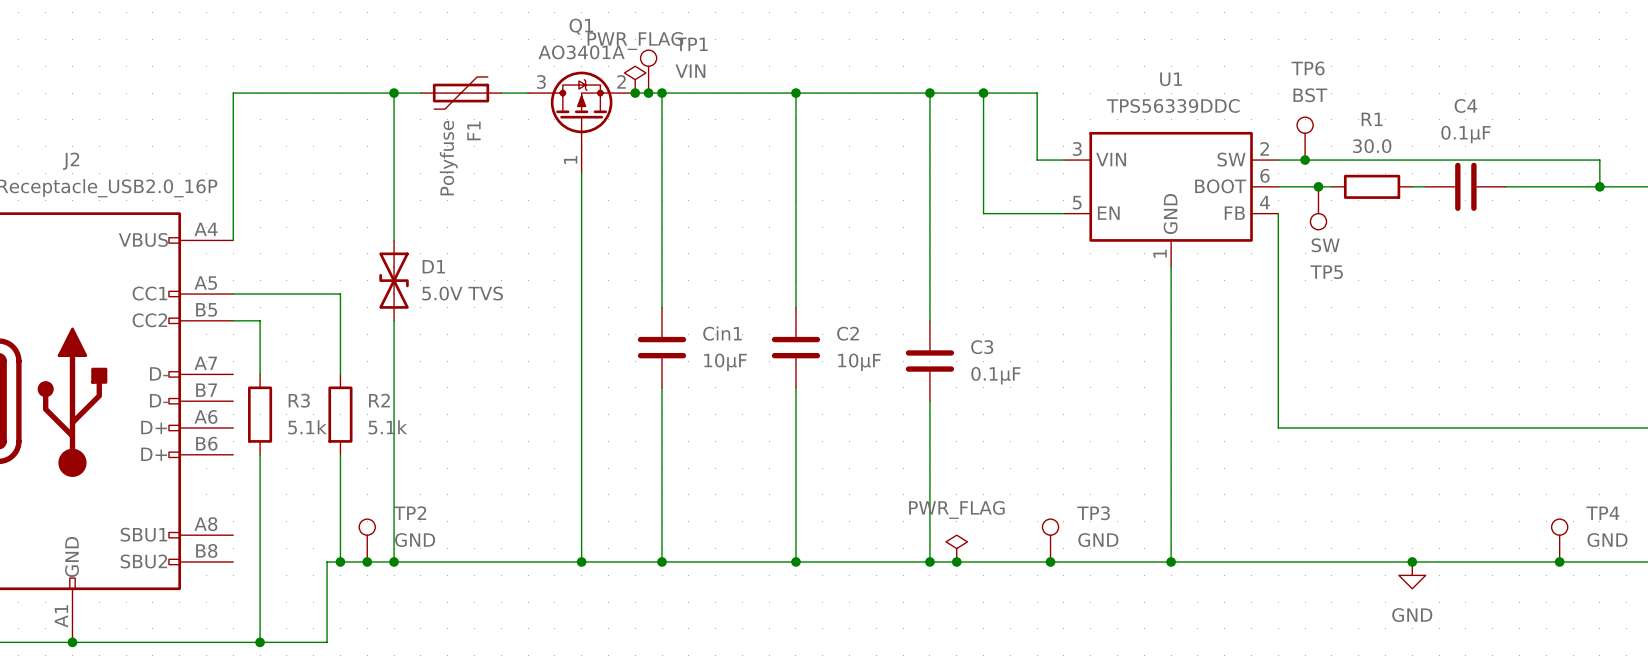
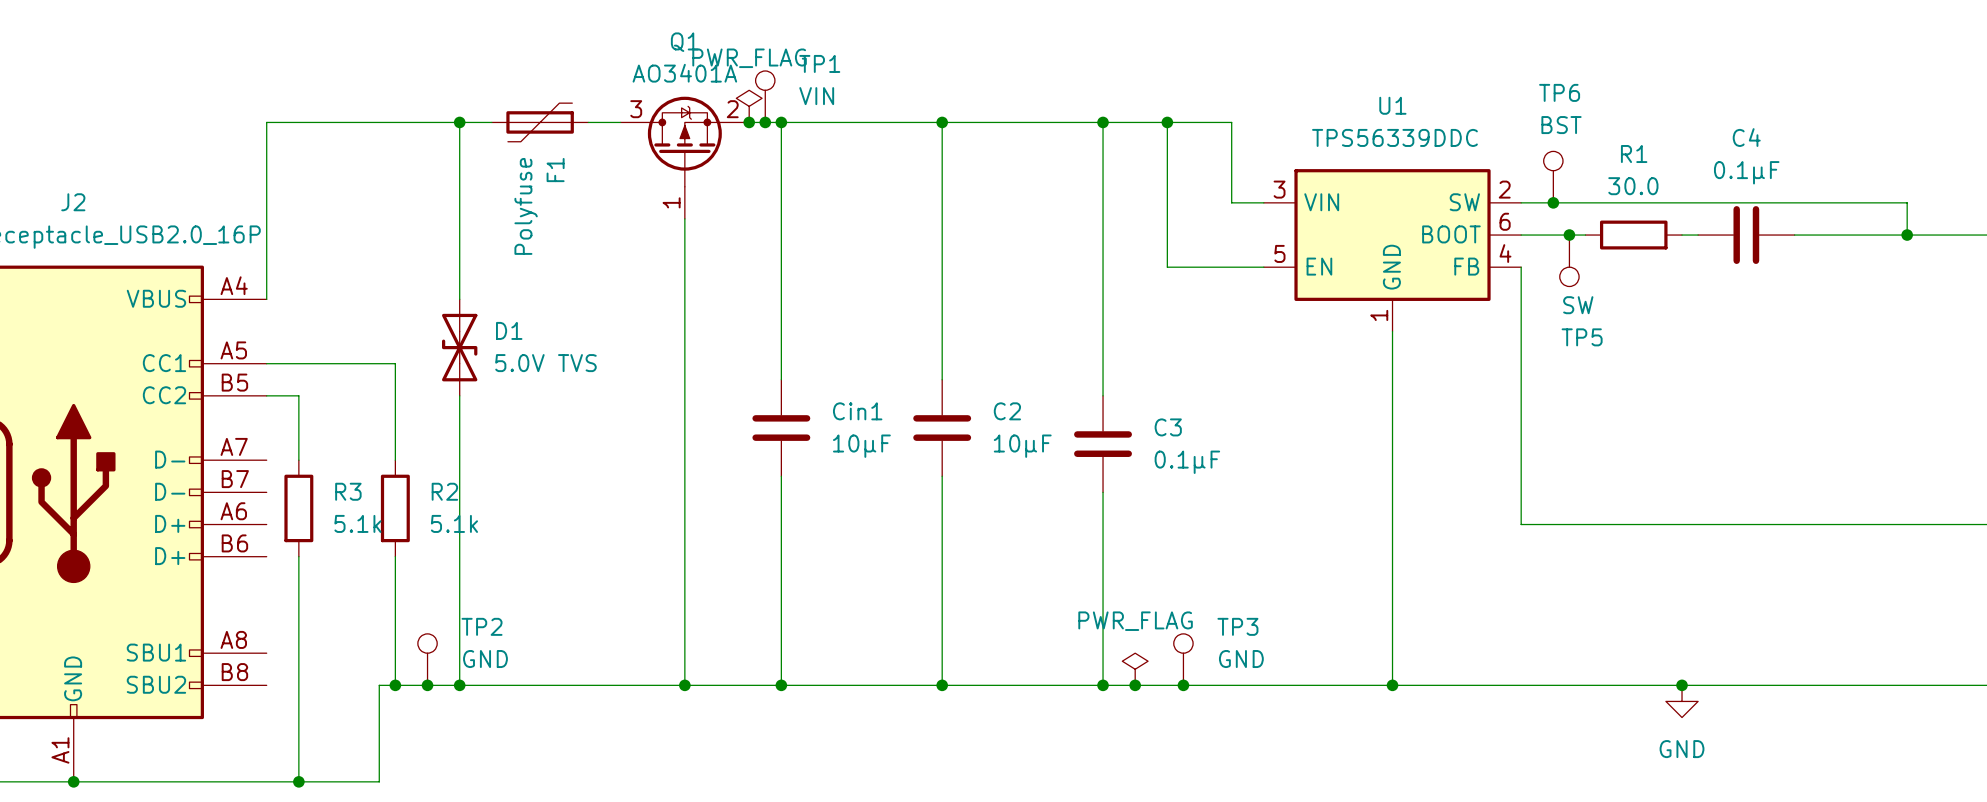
TP3 position: (1050, 540) -> (1183, 659)
TP4: GND (1559, 540) -> none
junction position: (1050, 561) -> (1183, 685)
junction: (1559, 561) -> none

